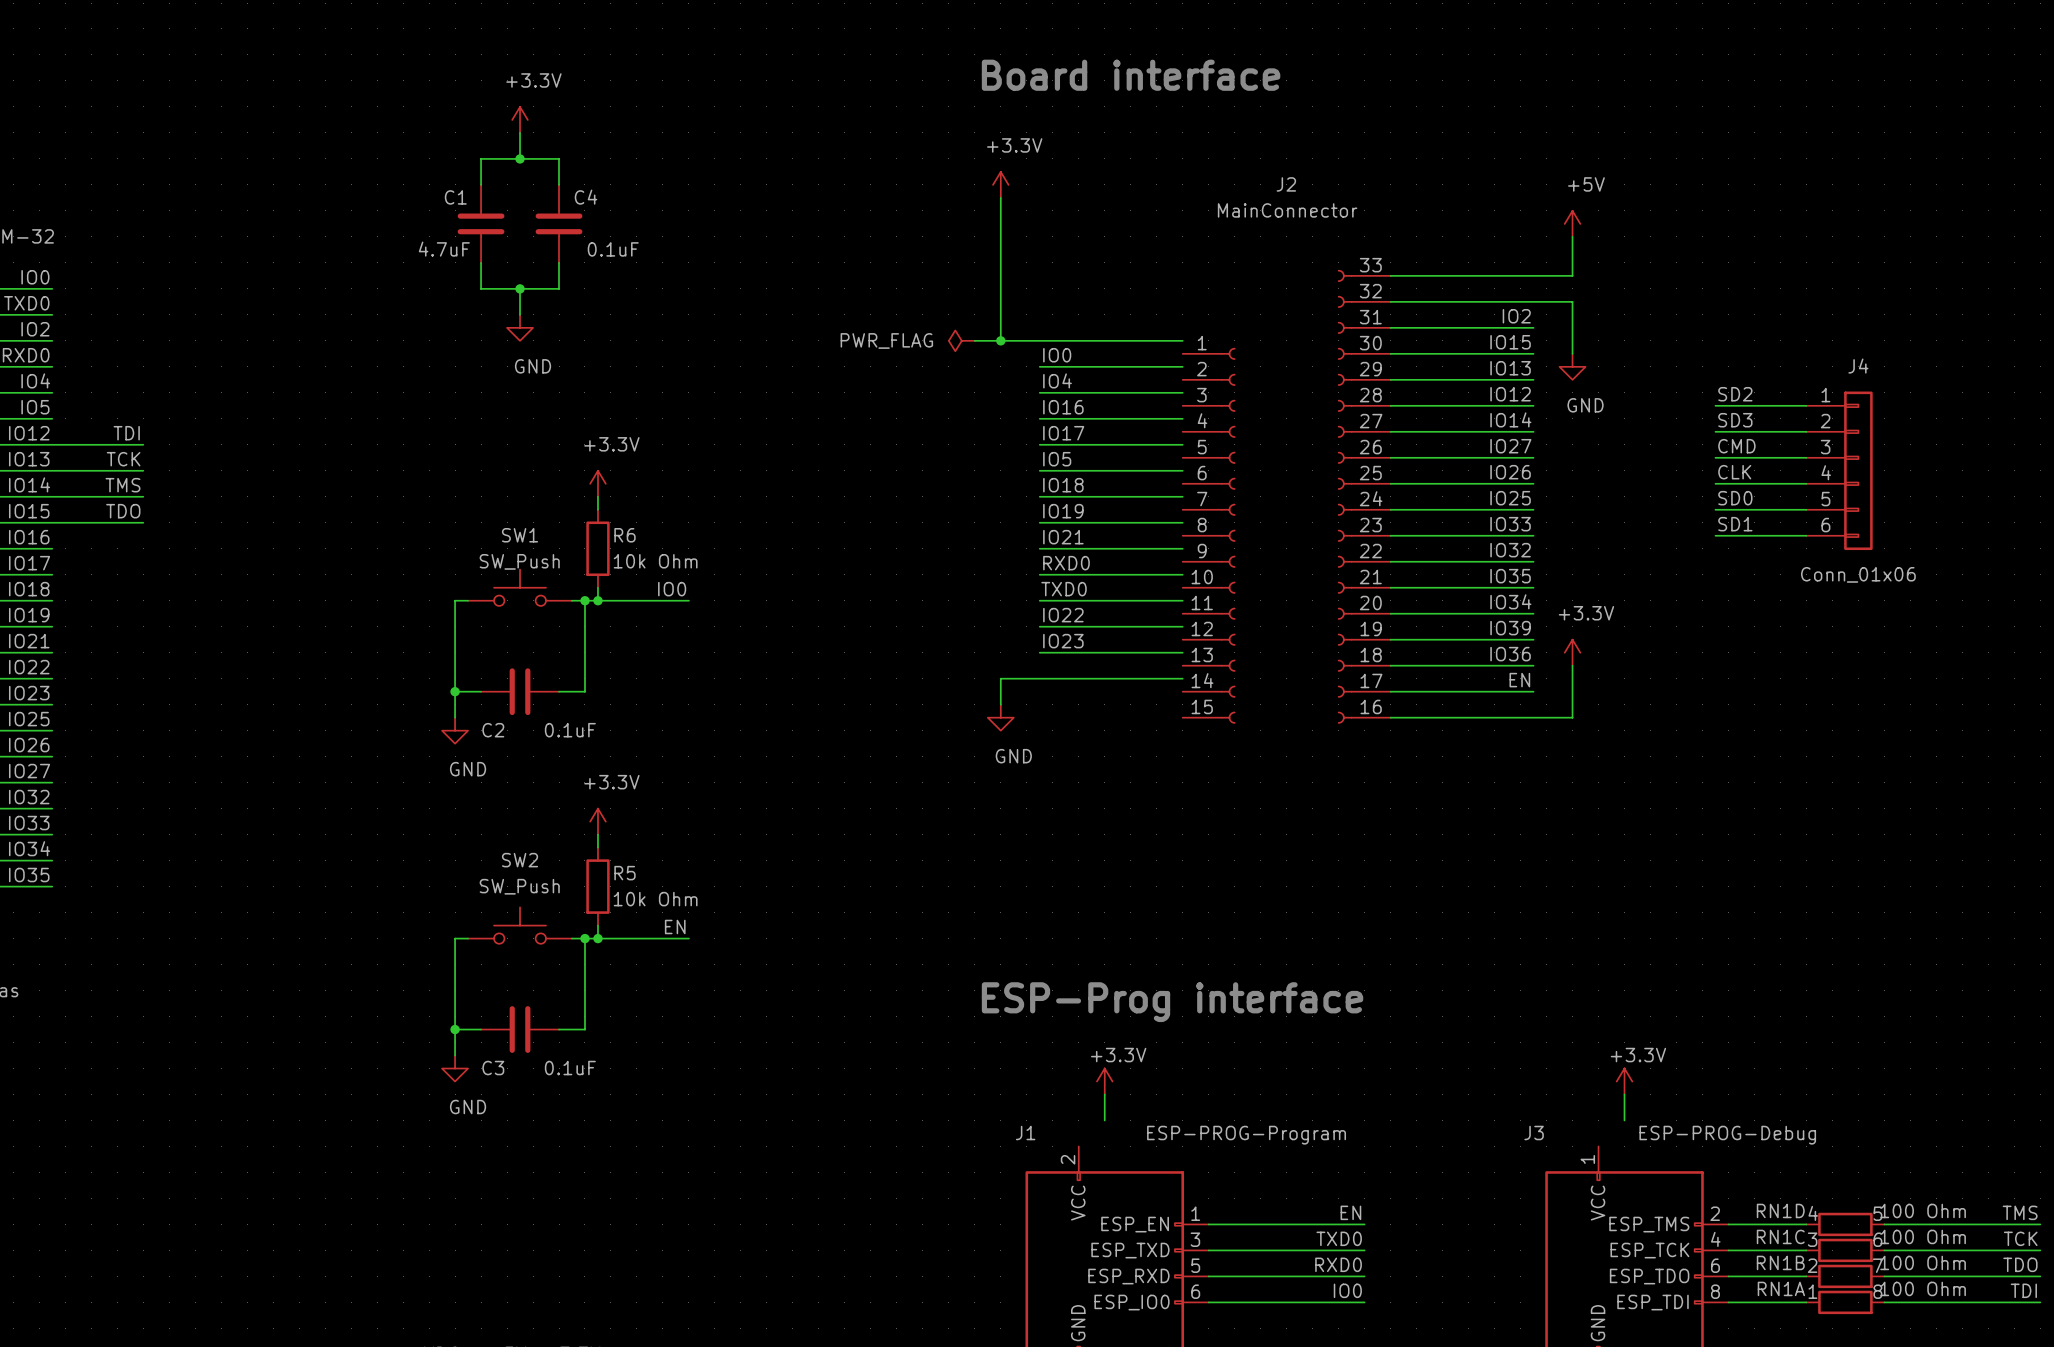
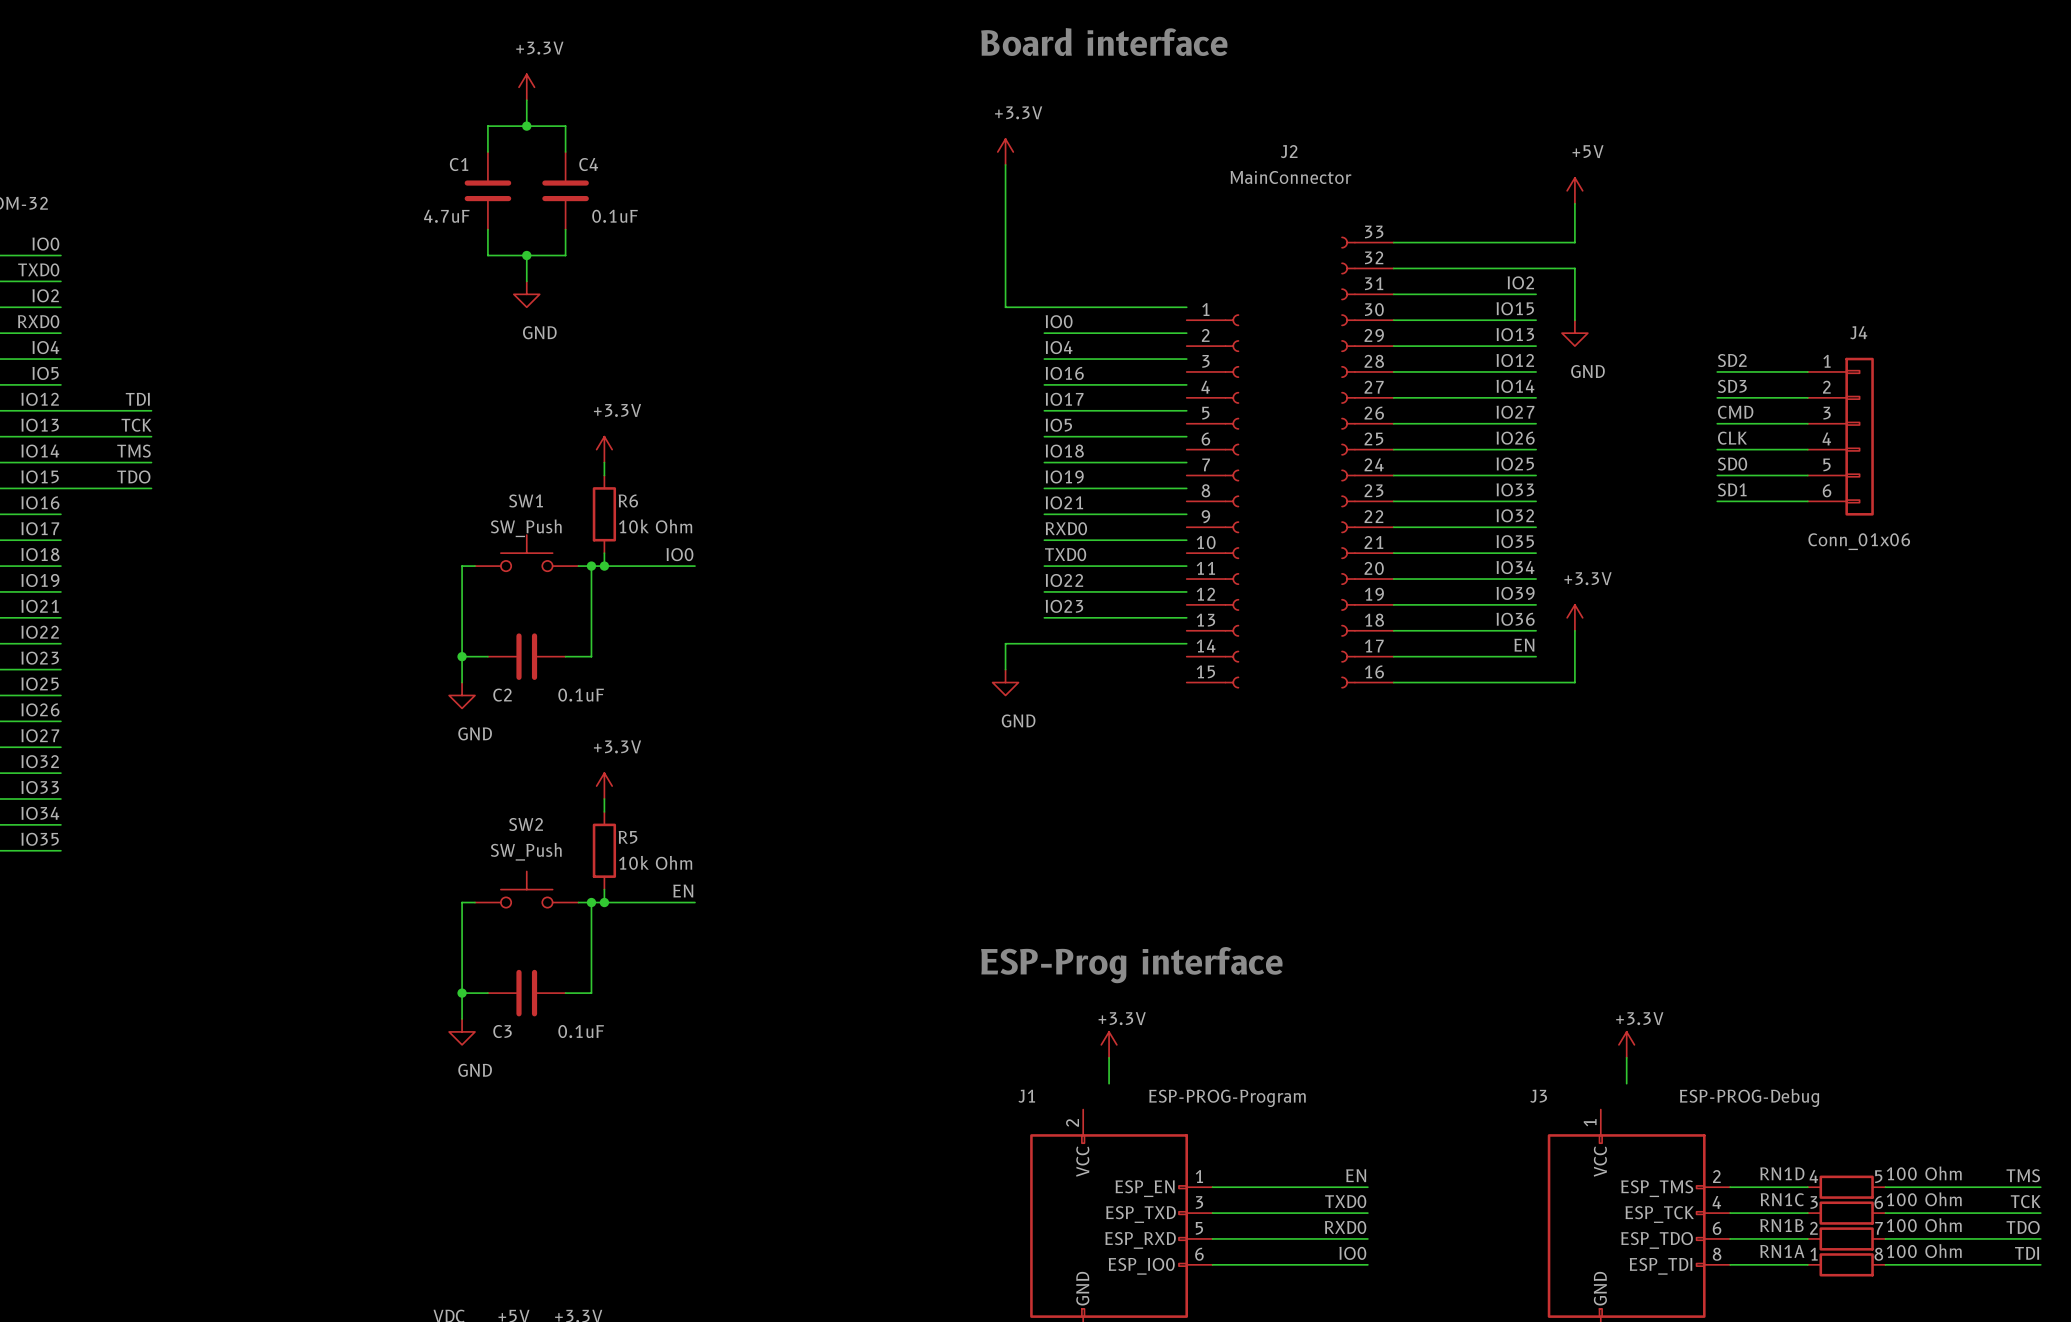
power symbol: PWR_FLAG (961, 340) -> none
wire: (974, 340) (1000, 340) -> none
junction: (1000, 340) -> none

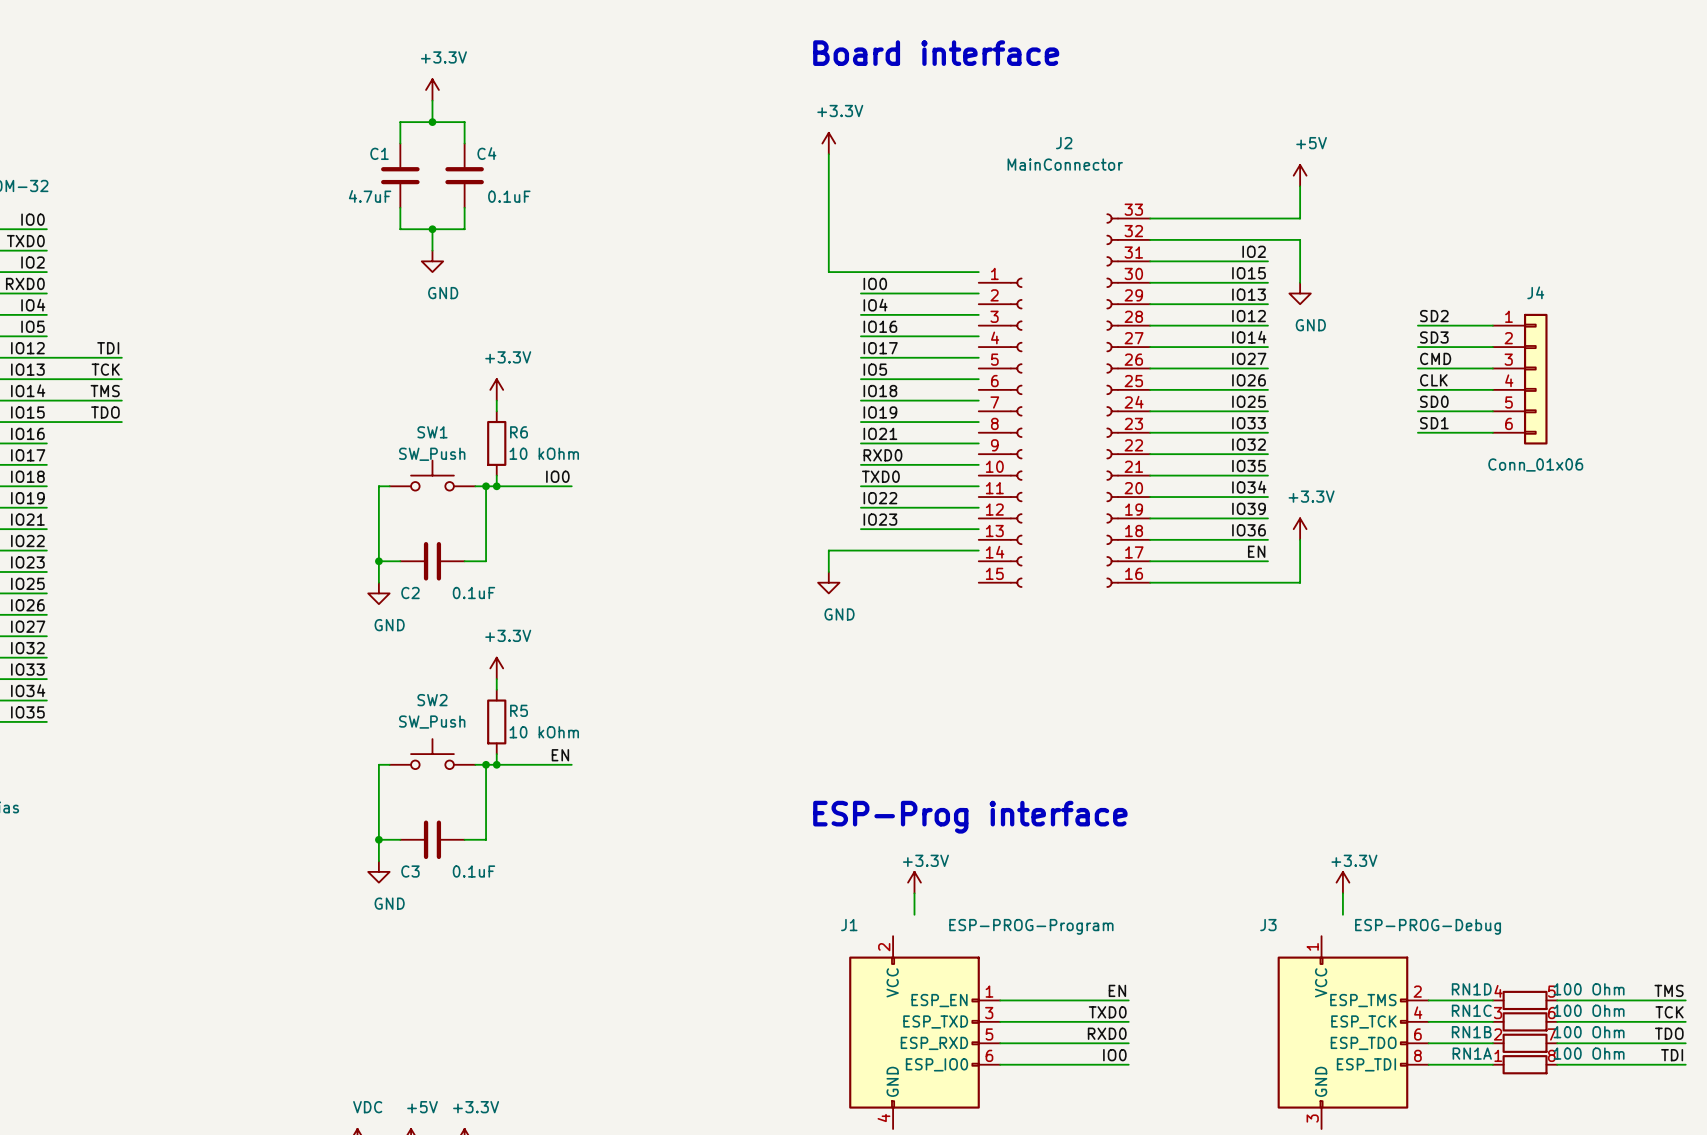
R6 value: 10k Ohm (655, 526) -> 10 kOhm (544, 453)
R5 value: 10k Ohm (655, 862) -> 10 kOhm (544, 732)

